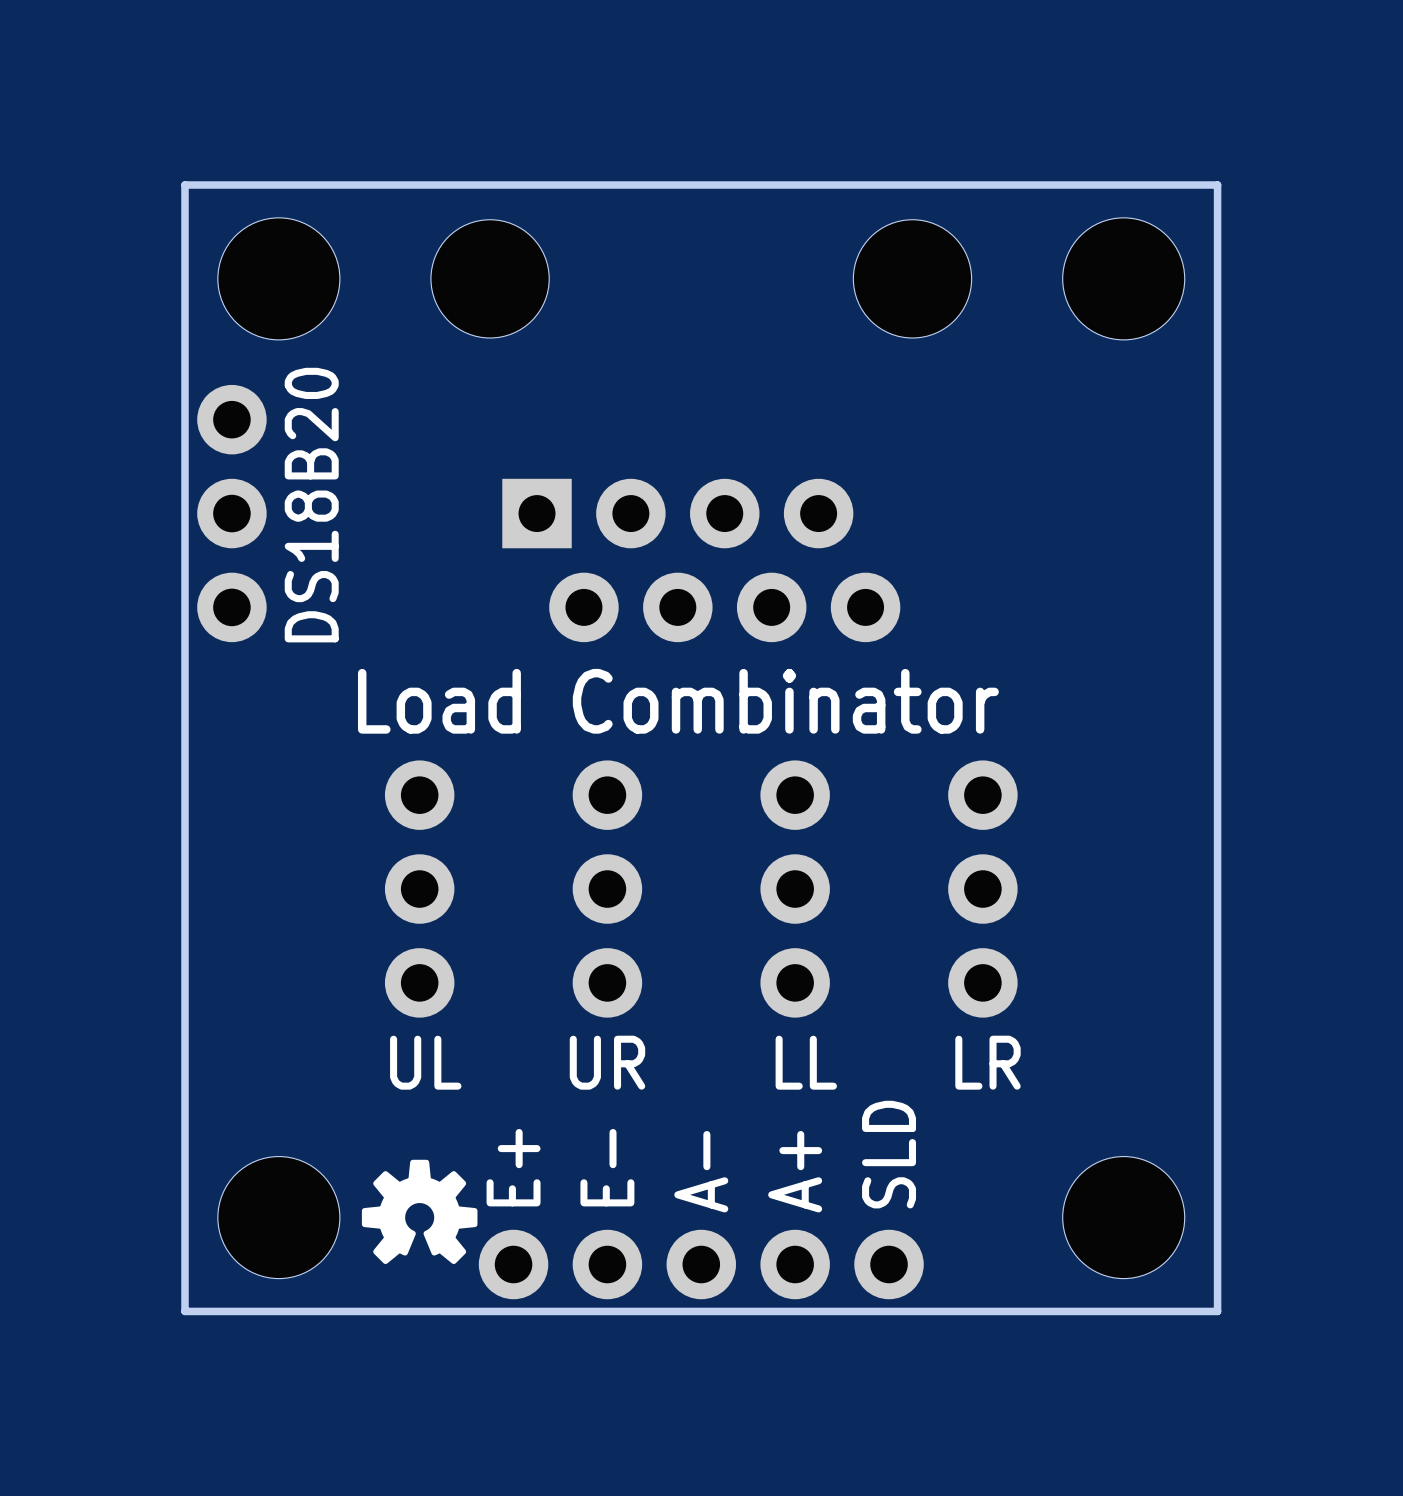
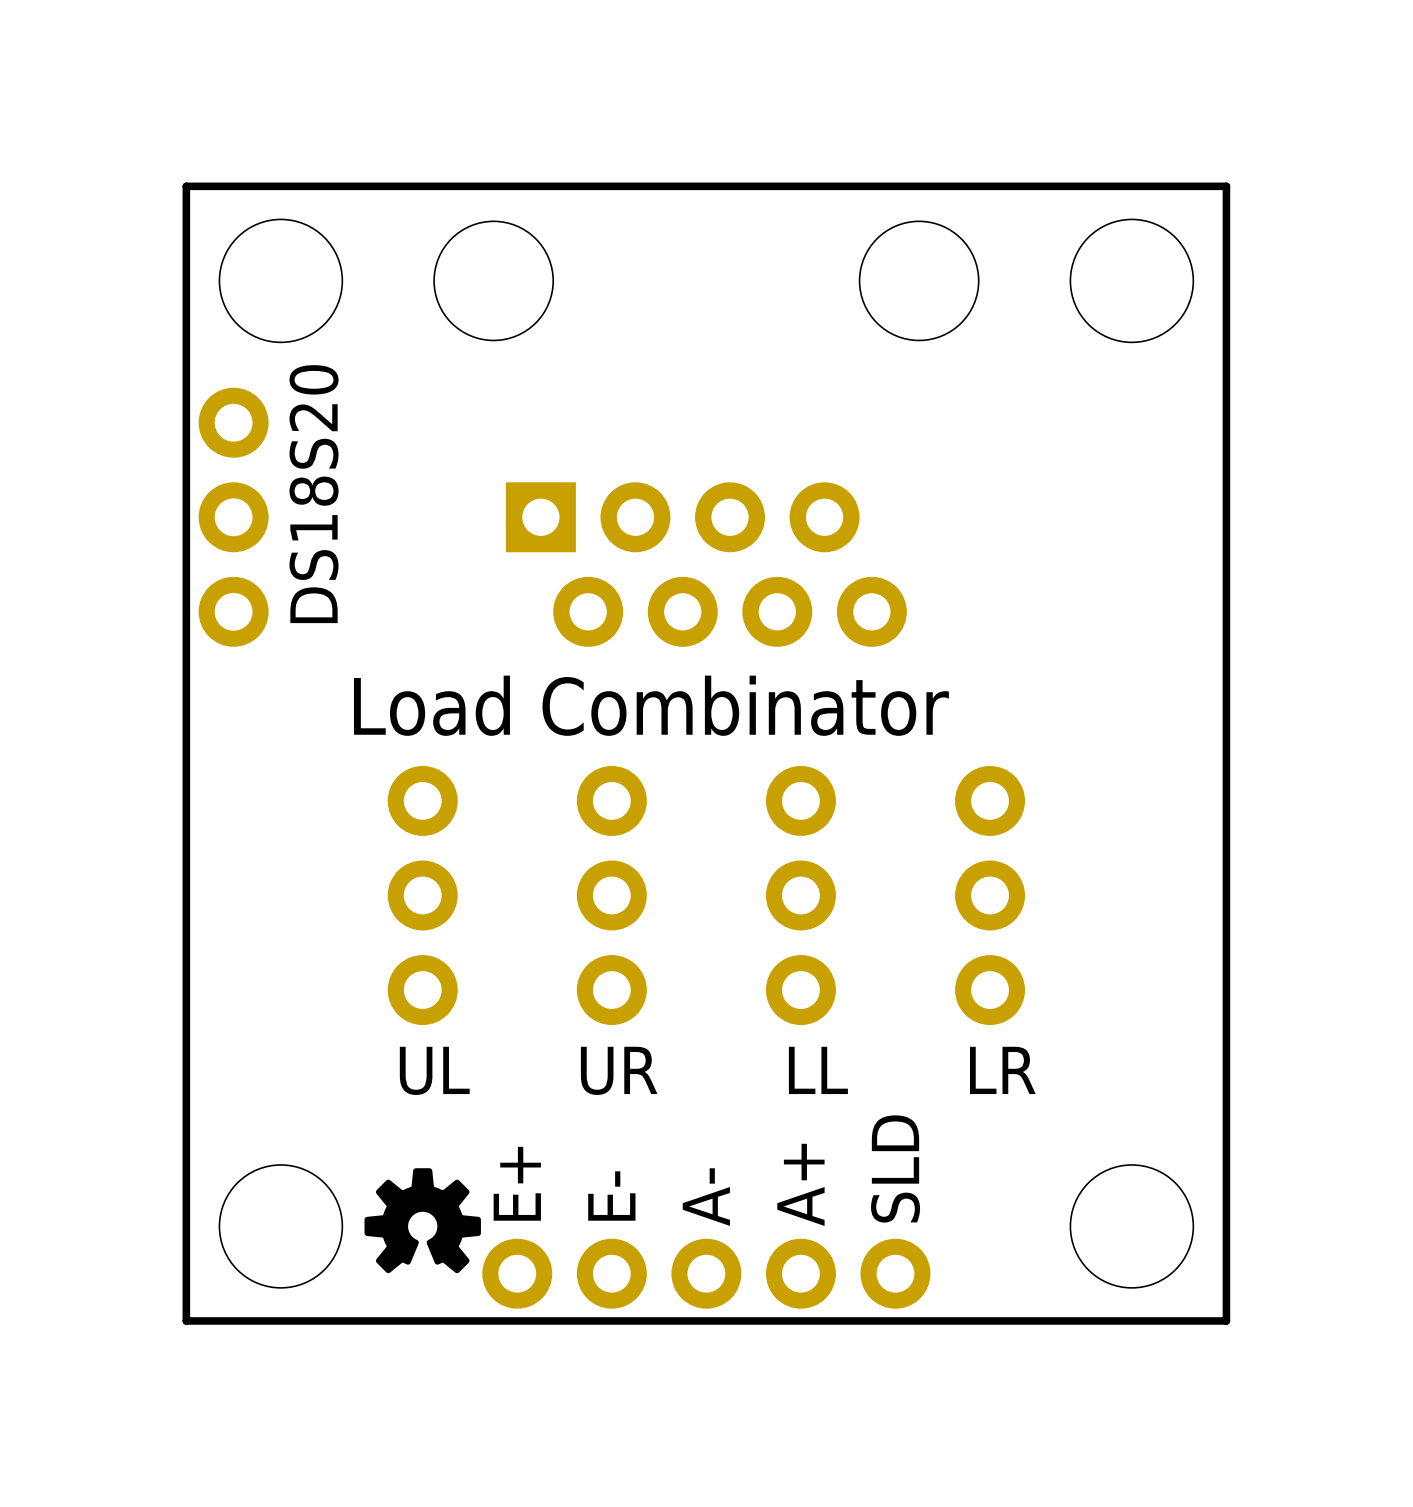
text: DS18B20 (311, 505) -> DS18S20 (314, 494)

